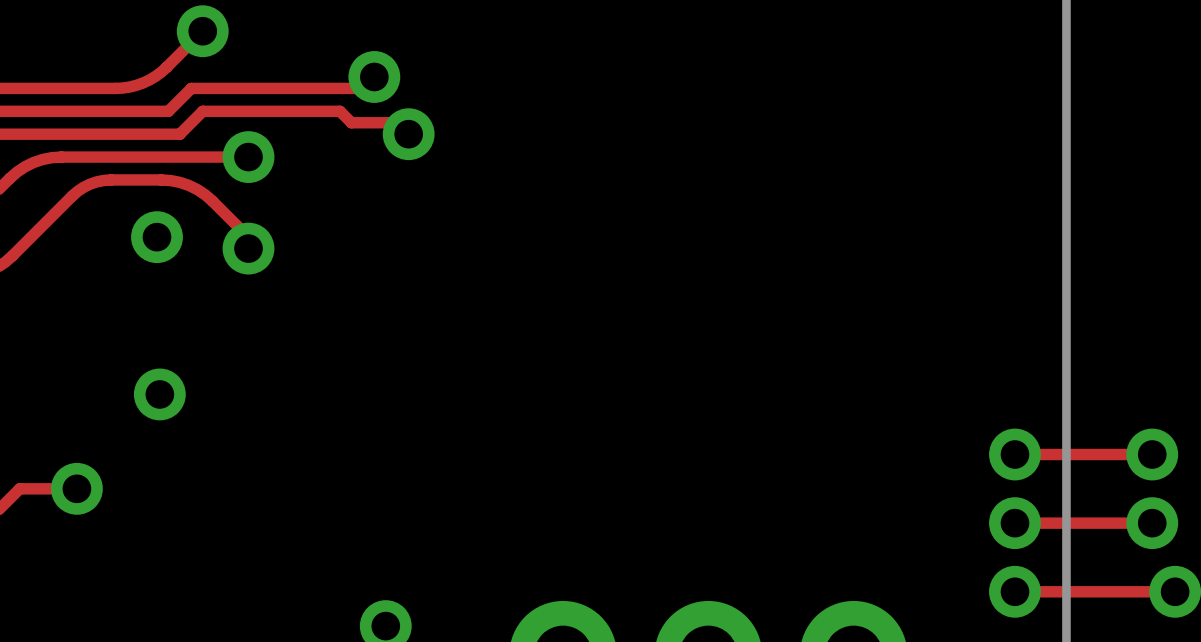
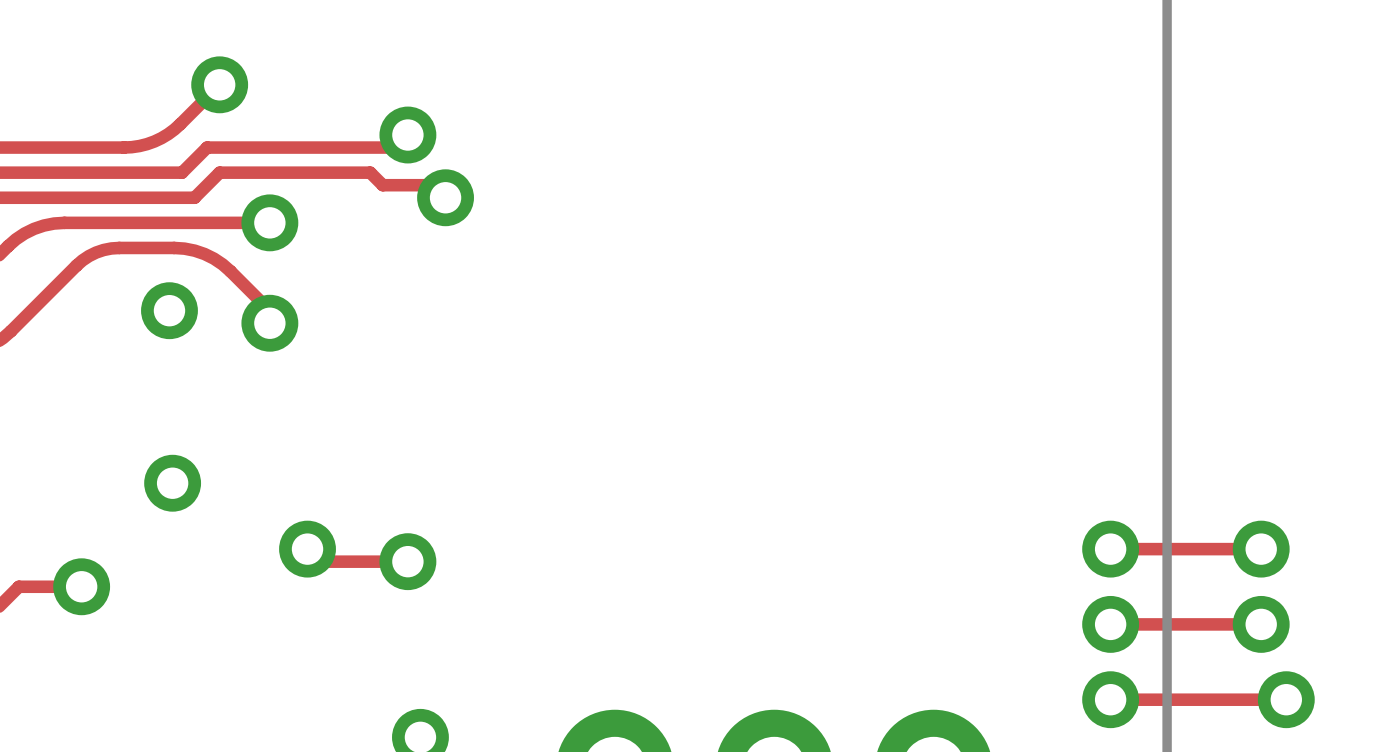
track: none -> (307, 549) (320, 561) (407, 561)
via: none -> (307, 549)
via: none -> (407, 561)

